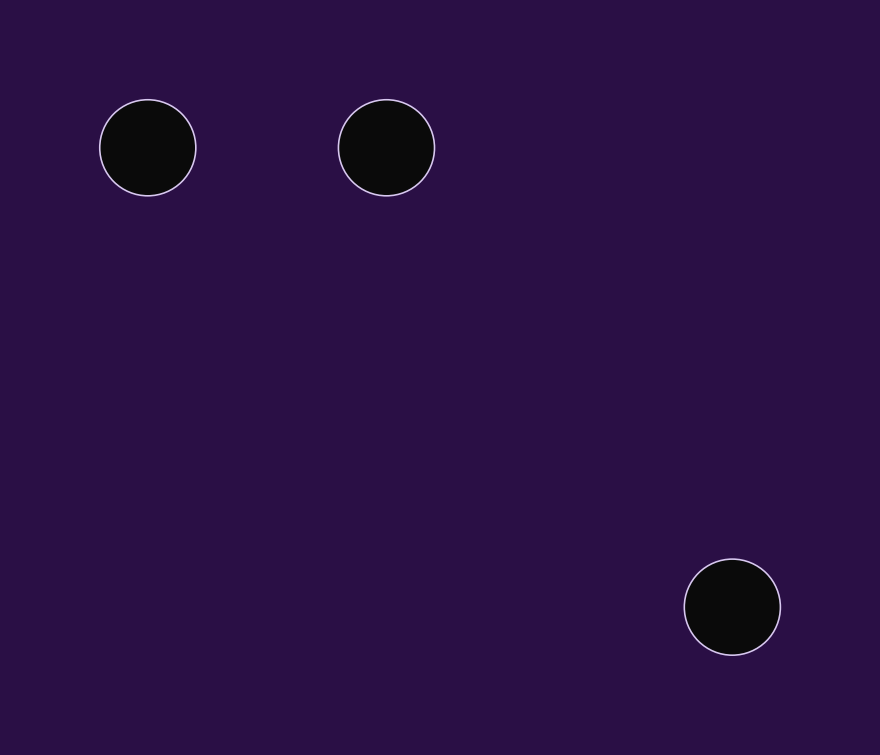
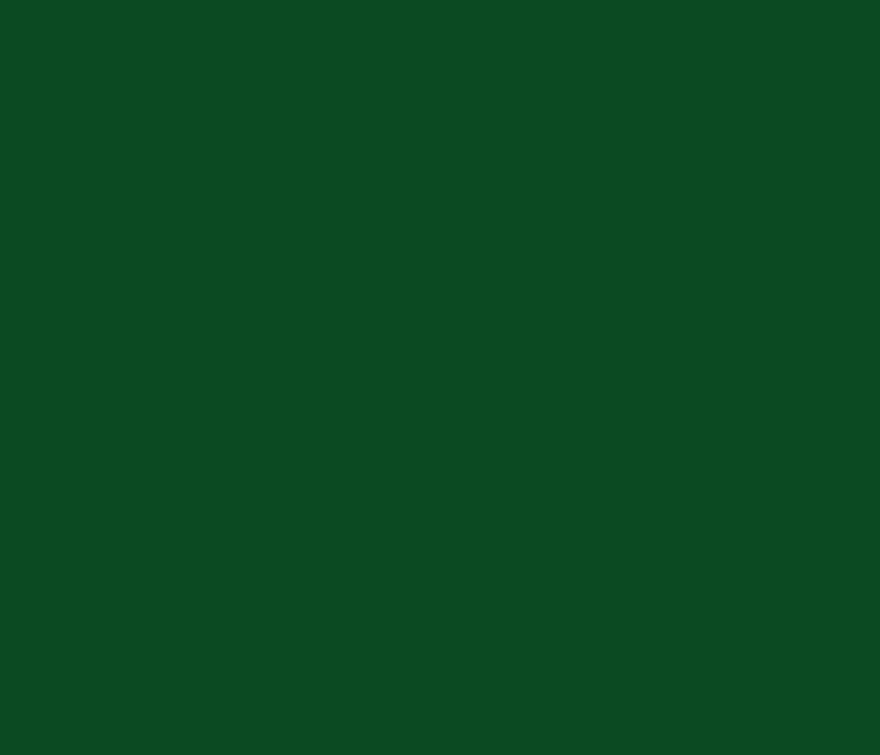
part: (147, 147) -> none
part: (386, 147) -> none
part: (732, 607) -> none

